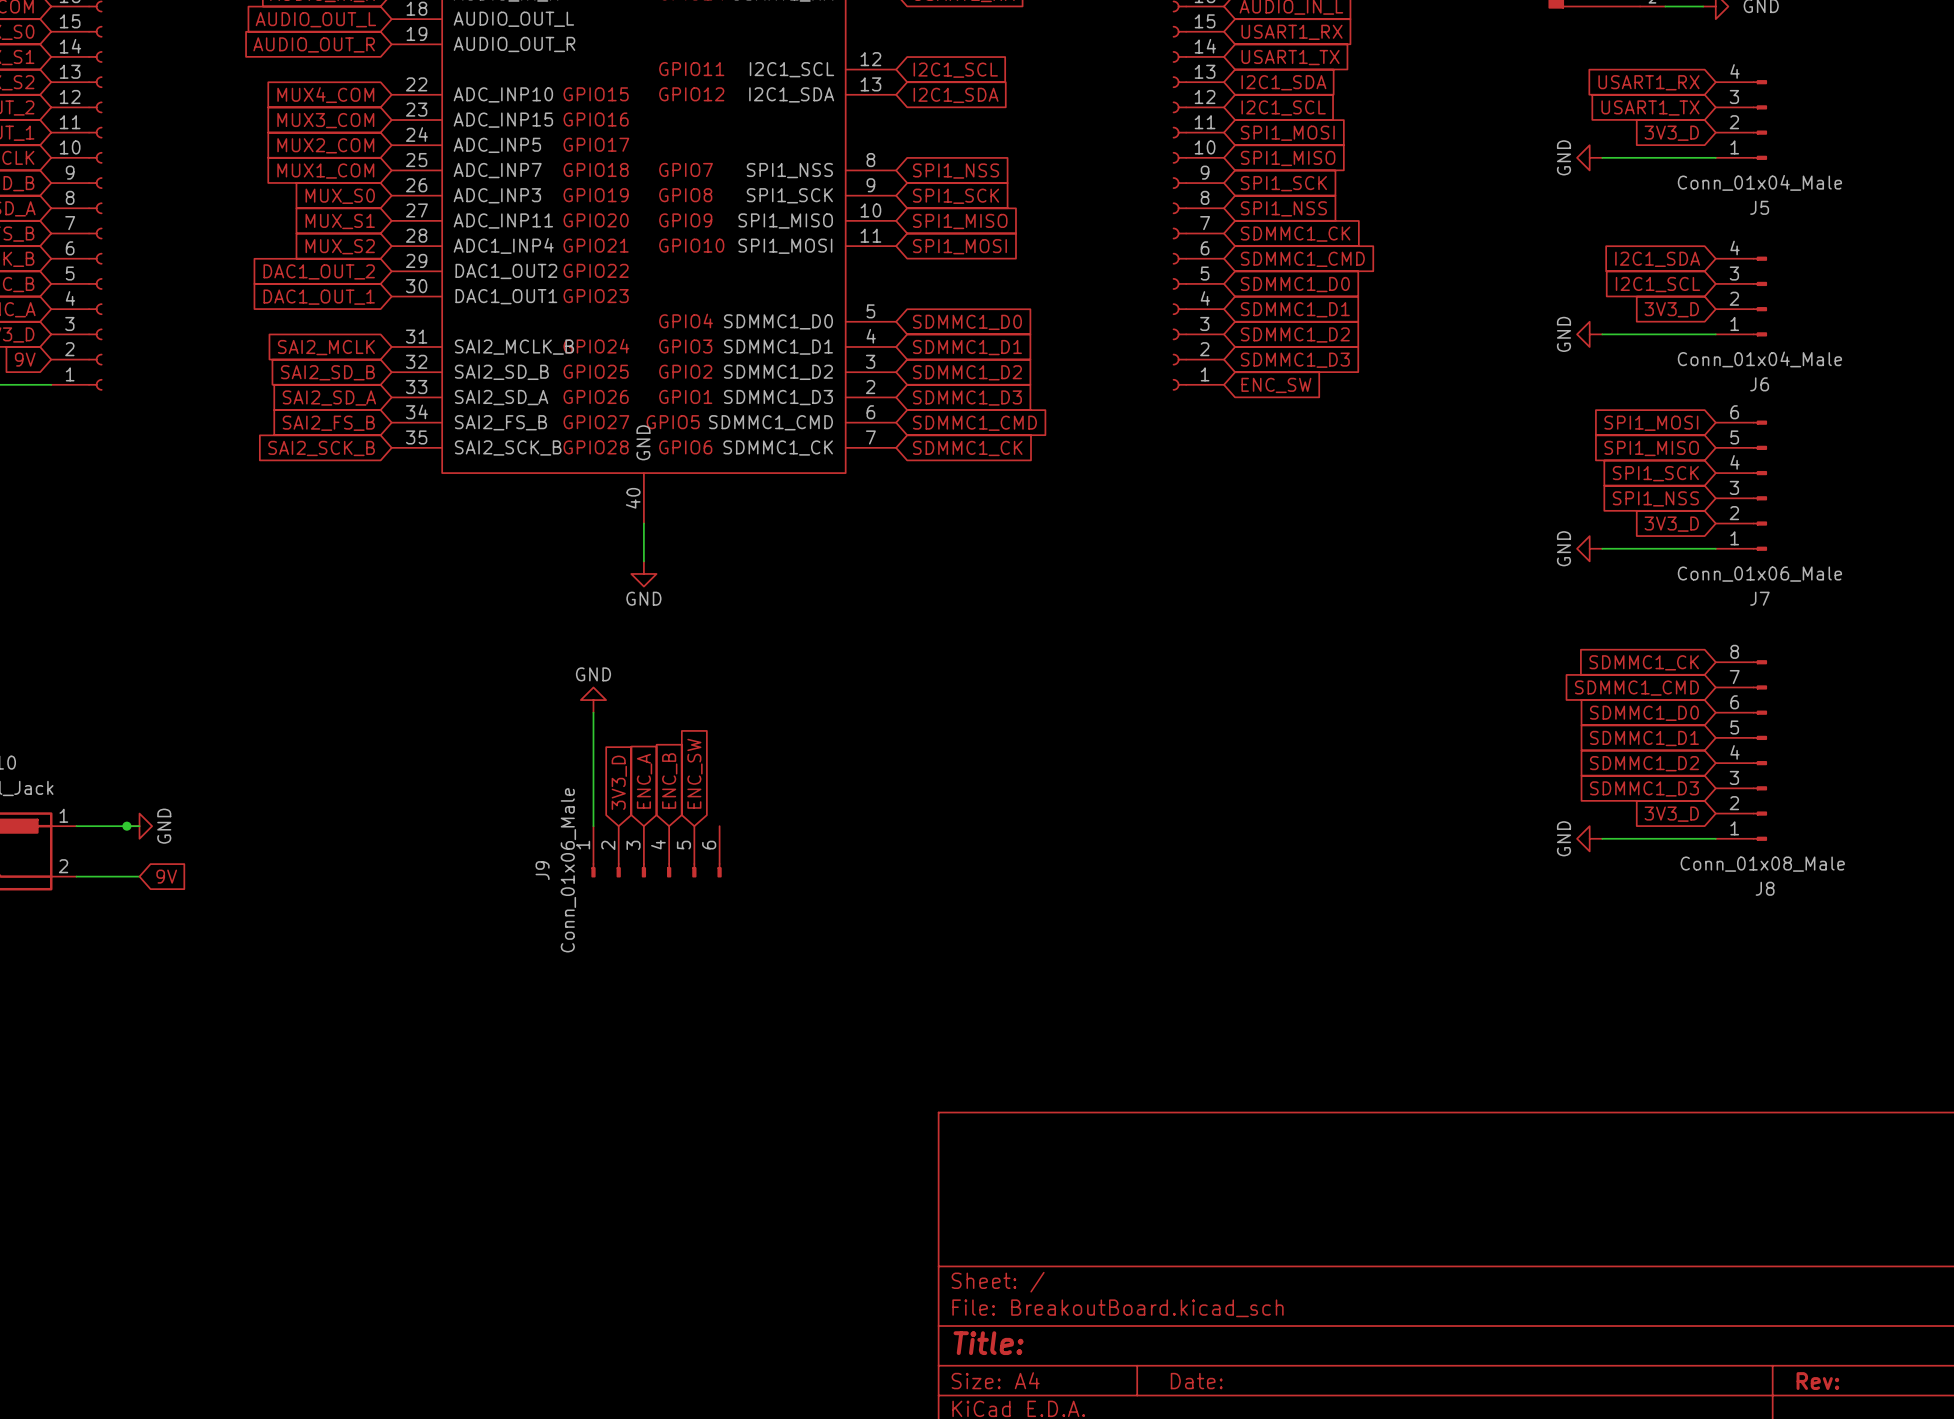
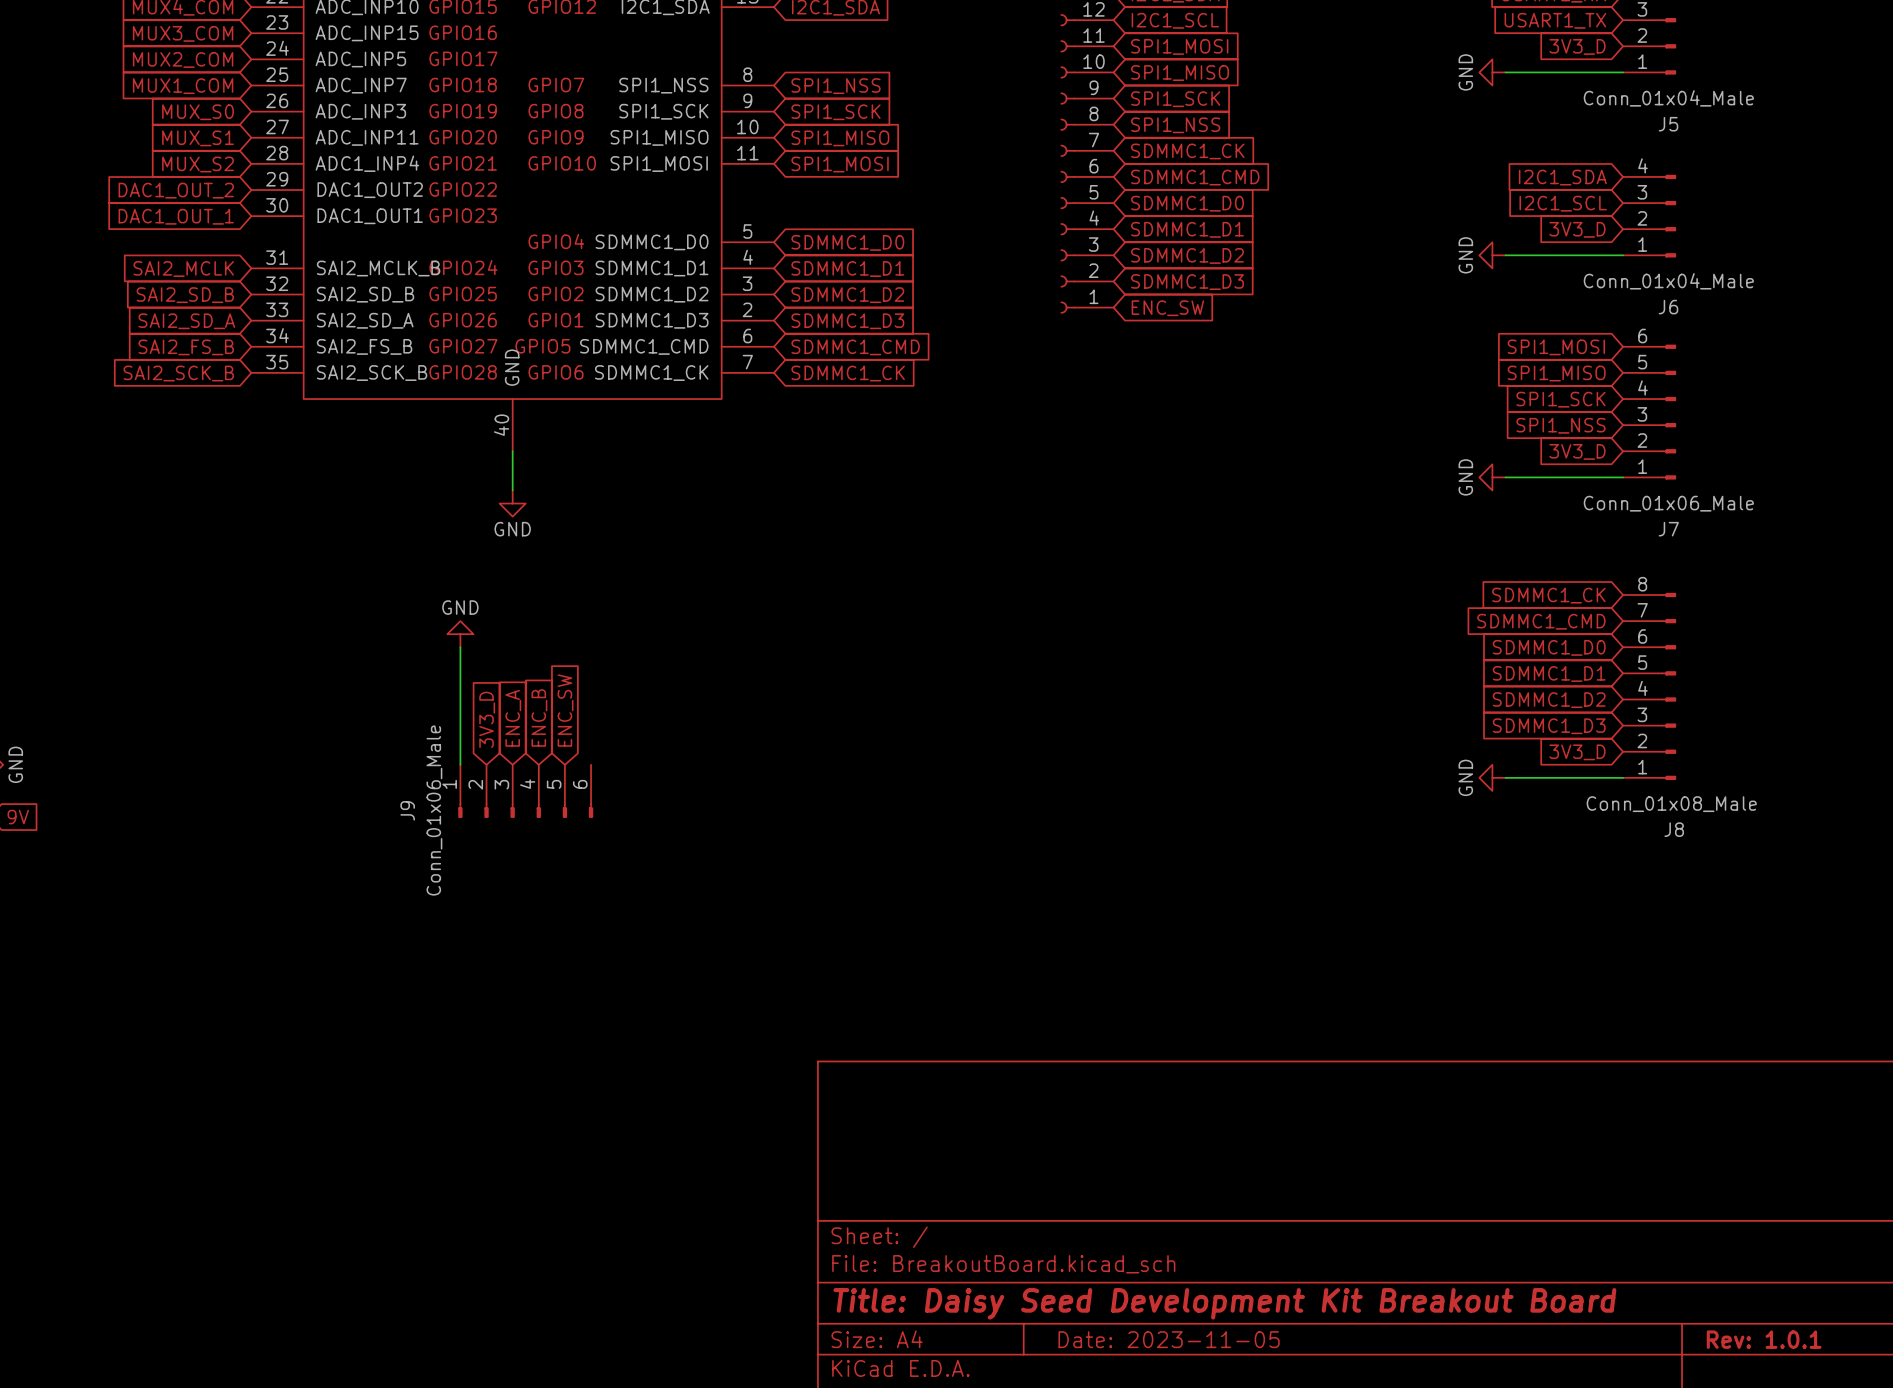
title block: Title: (988, 1343) -> Title: Daisy Seed Development Kit Breakout Board (1224, 1303)
title block: Date: (1196, 1381) -> Date: 2023-11-05 (1169, 1339)
title block: Rev: (1817, 1381) -> Rev: 1.0.1 (1764, 1339)

